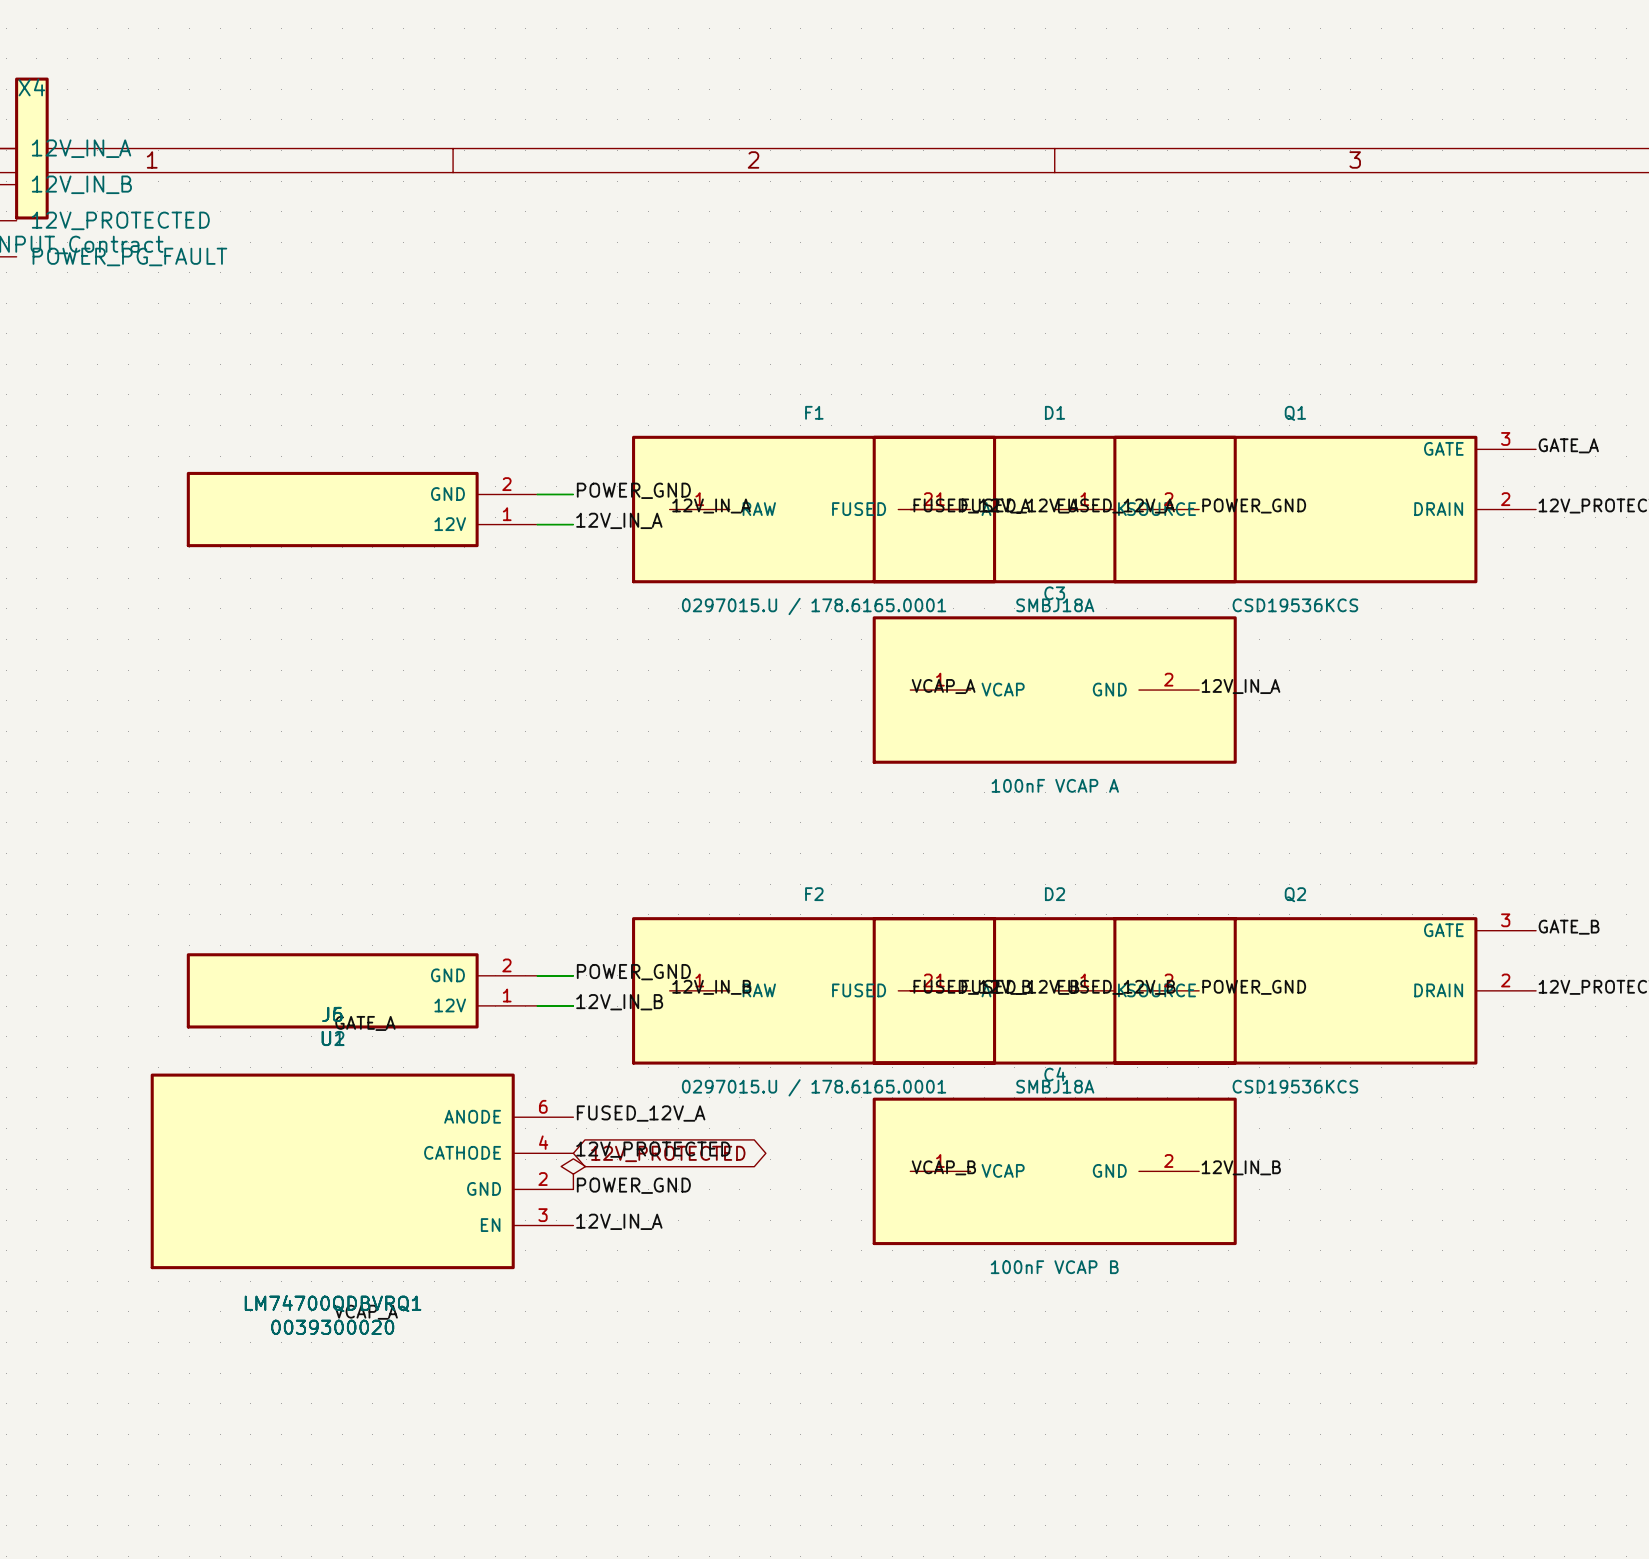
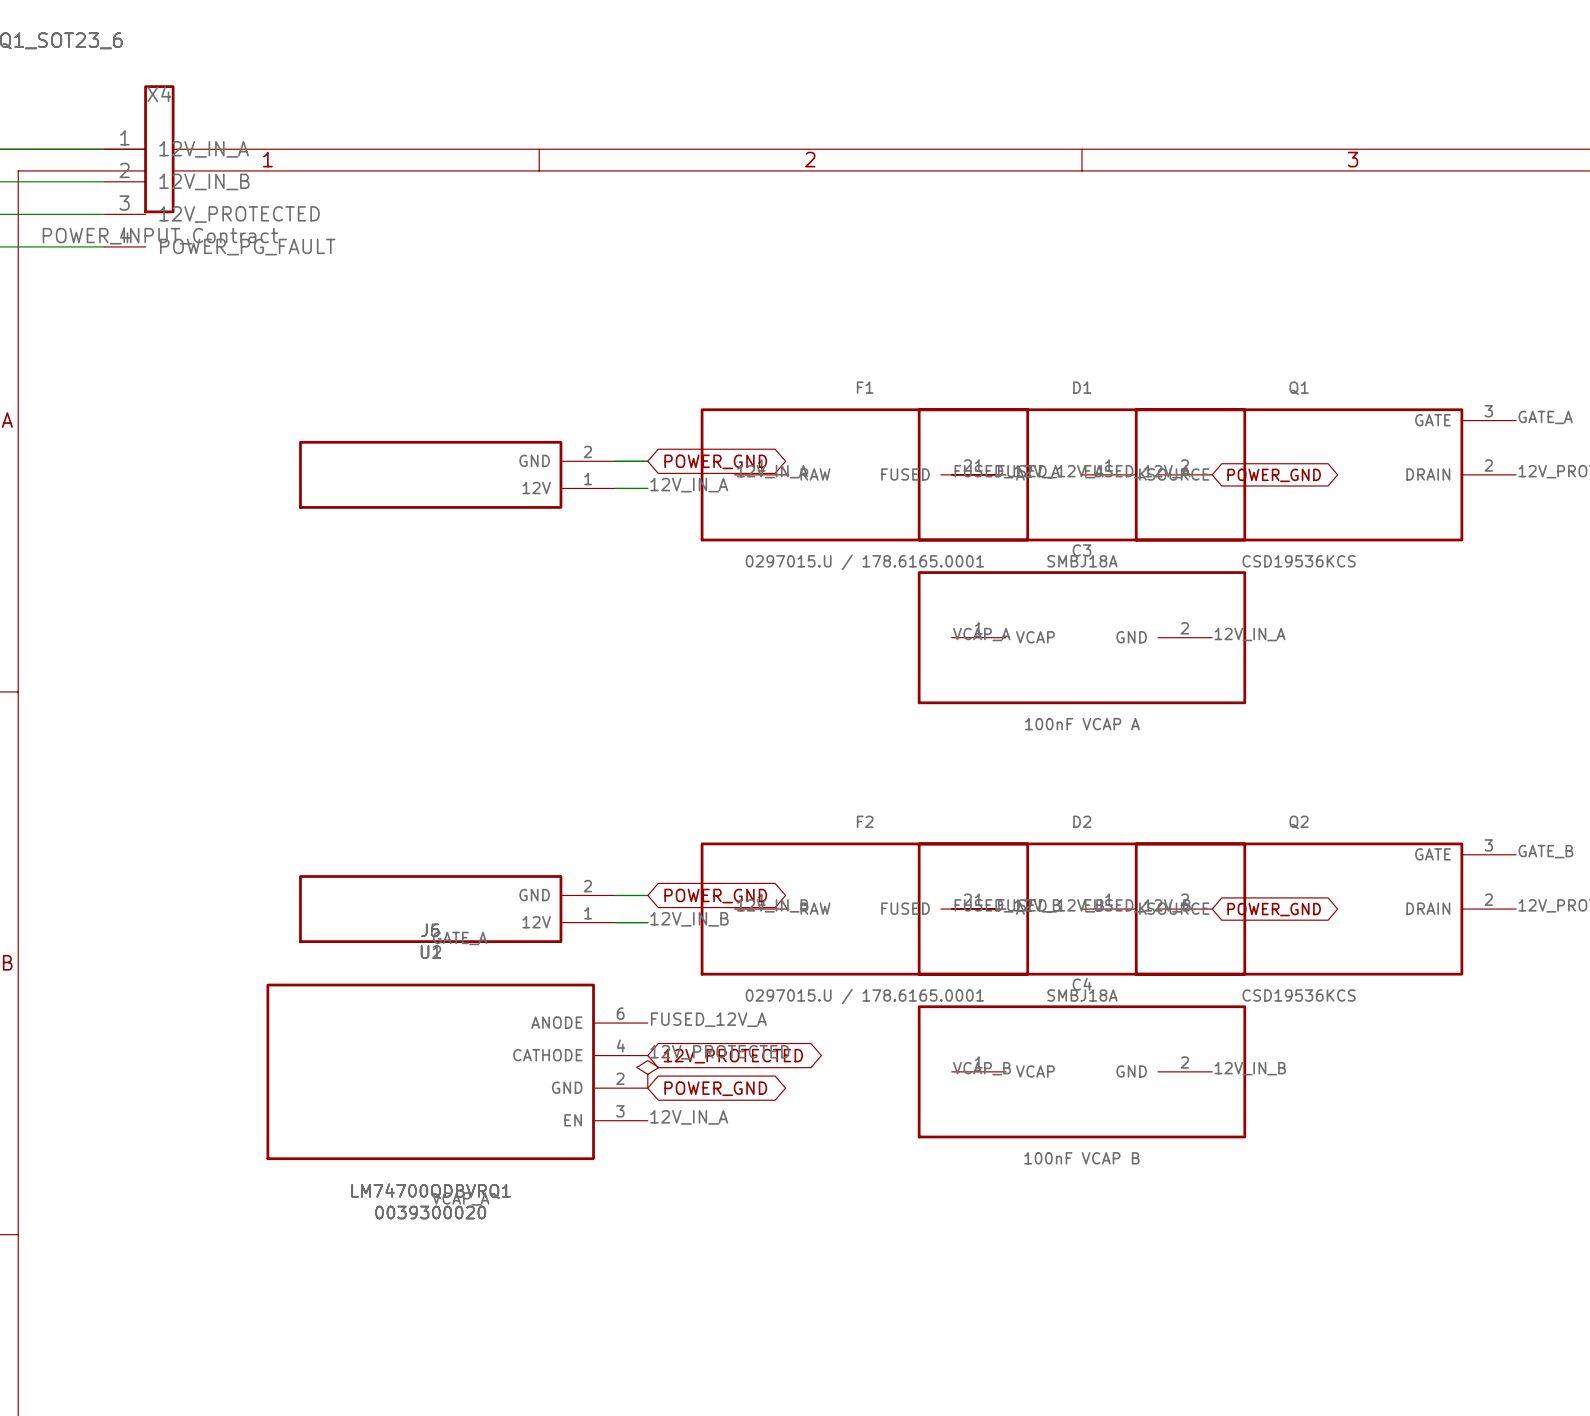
label: POWER_GND (633, 490) -> none
global label: none -> POWER_GND (715, 461)
label: POWER_GND (1254, 506) -> none
global label: none -> POWER_GND (1274, 475)
label: POWER_GND (633, 972) -> none
global label: none -> POWER_GND (715, 896)
label: POWER_GND (1254, 987) -> none
global label: none -> POWER_GND (1274, 909)
label: POWER_GND (633, 1185) -> none
global label: none -> POWER_GND (715, 1088)

